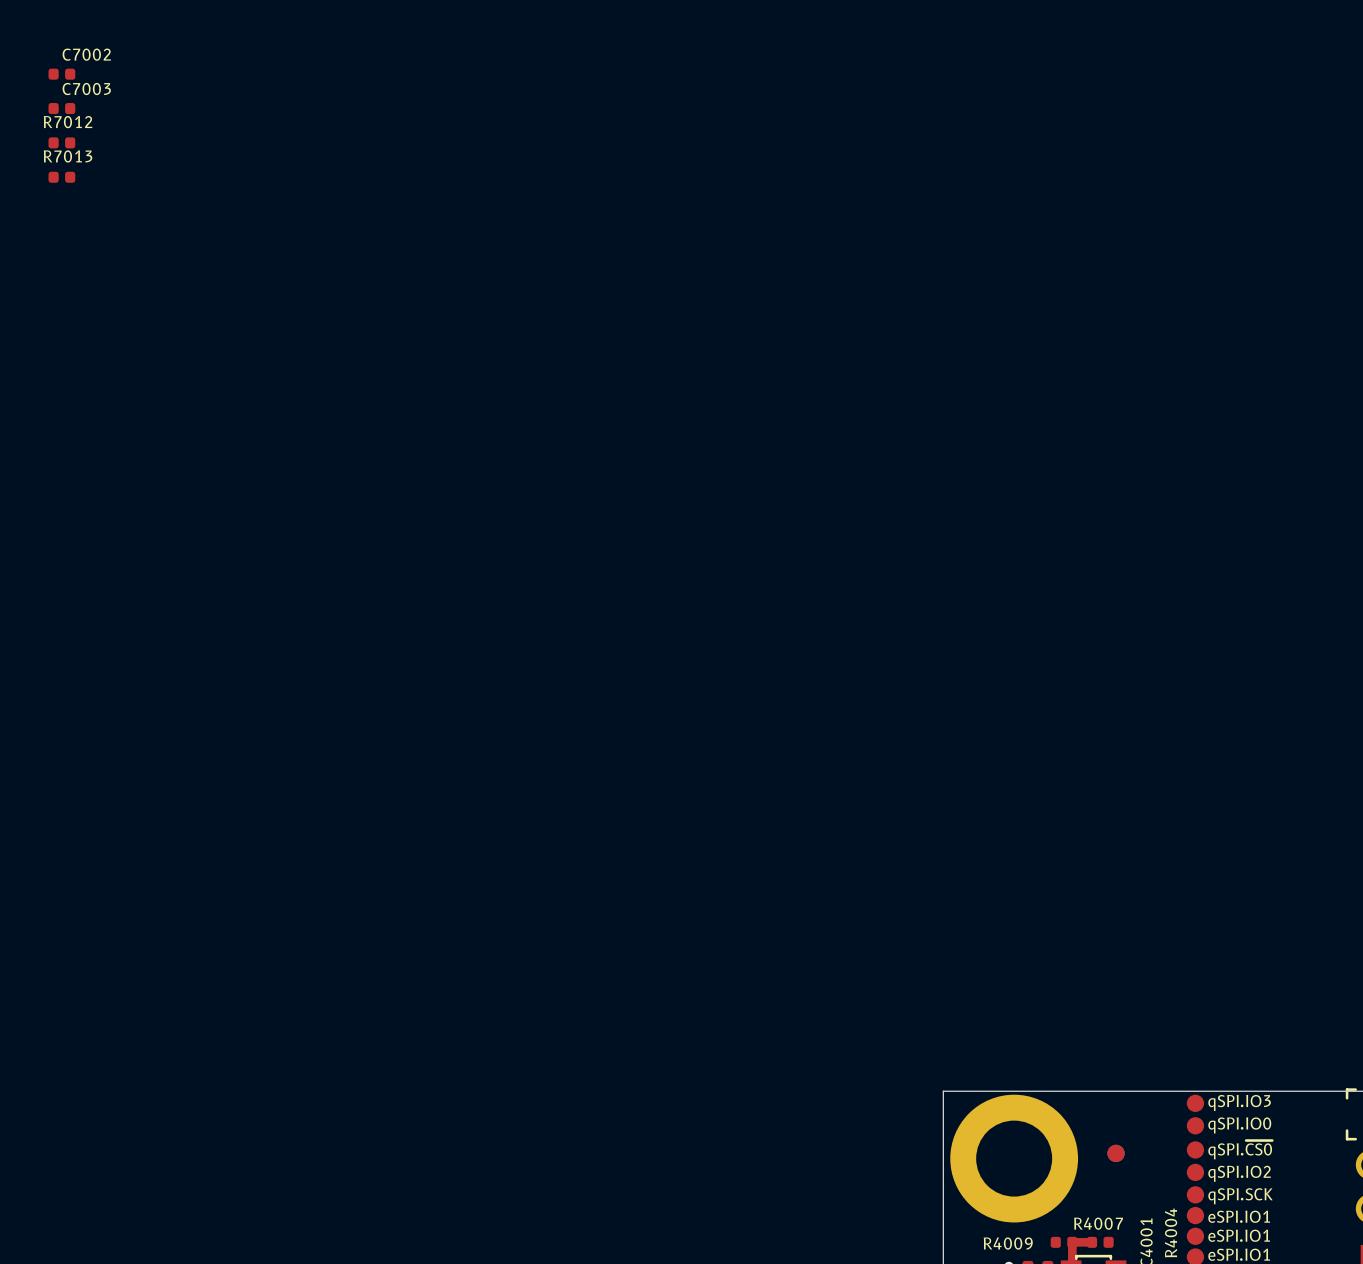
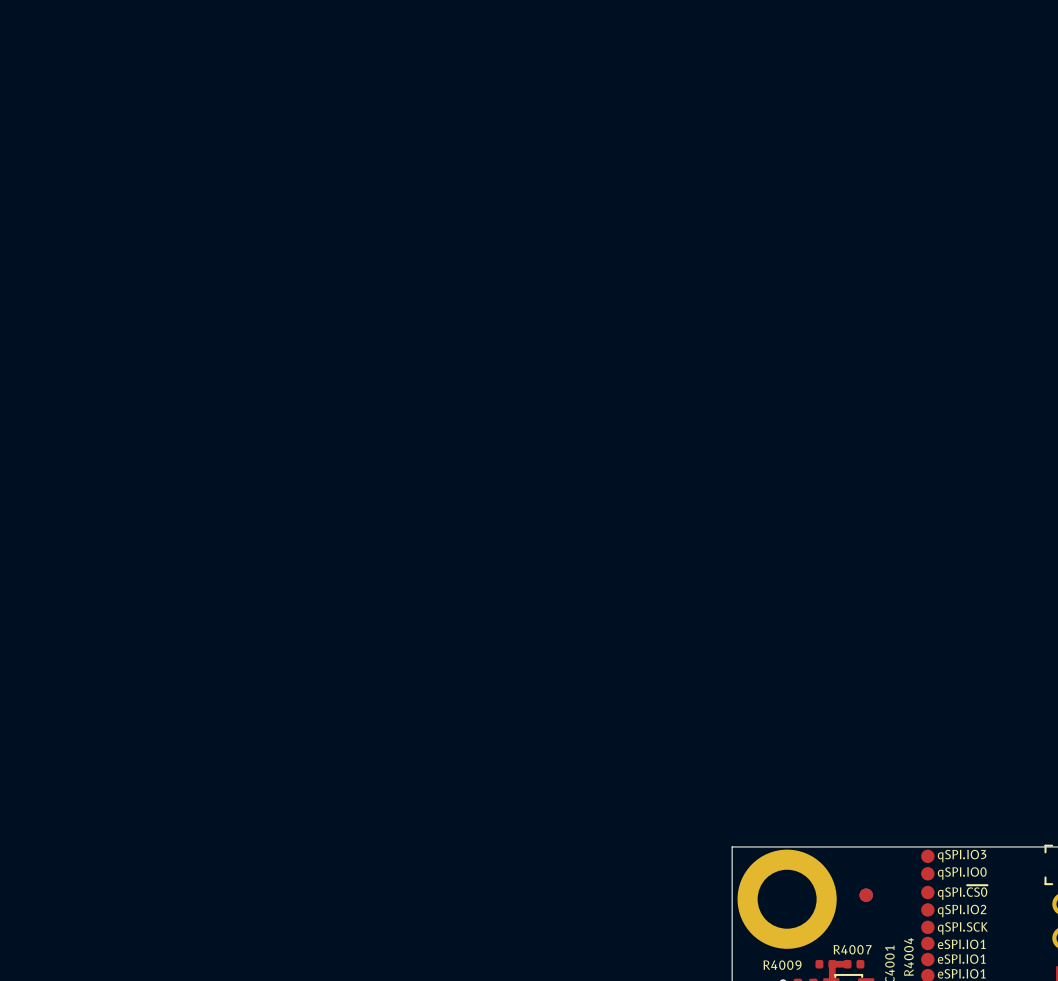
C7002: (61, 74) -> none
C7003: (61, 108) -> none
R7012: (61, 142) -> none
R7013: (61, 177) -> none

